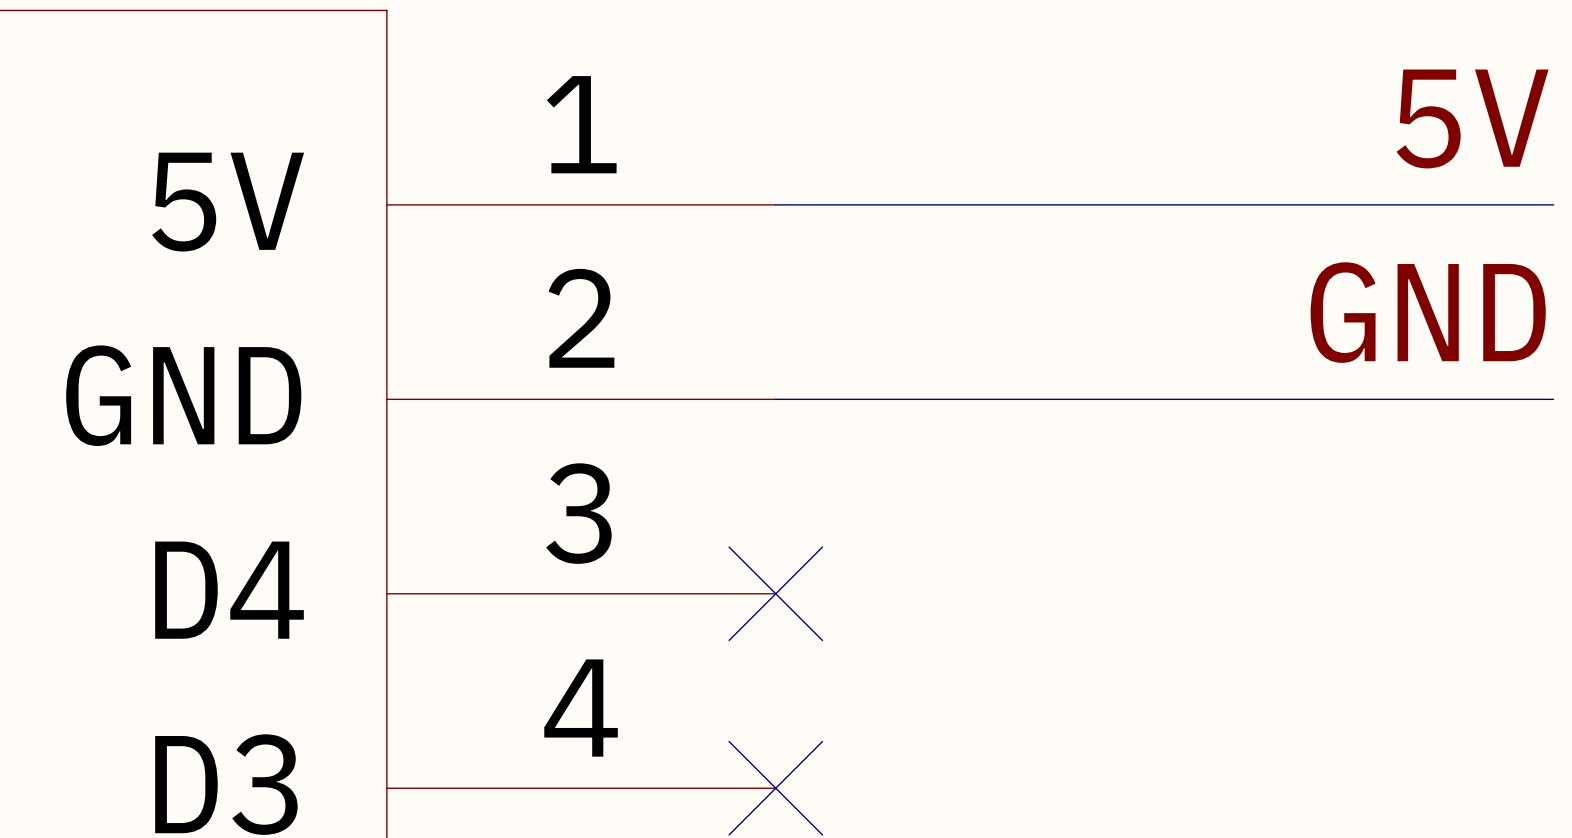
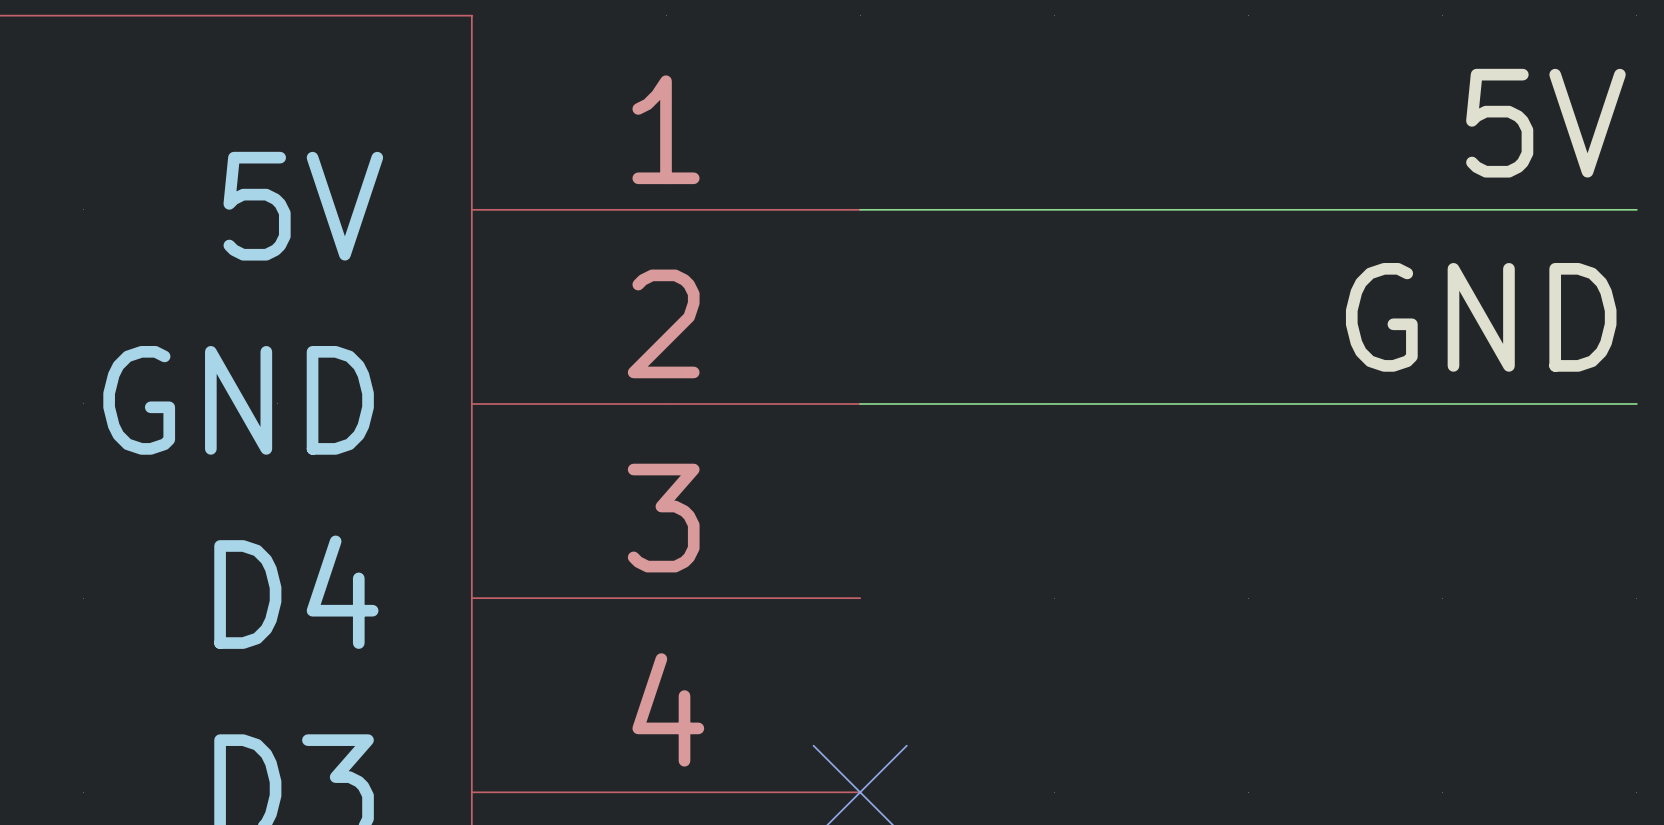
no-connect mark: (775, 593) -> none

